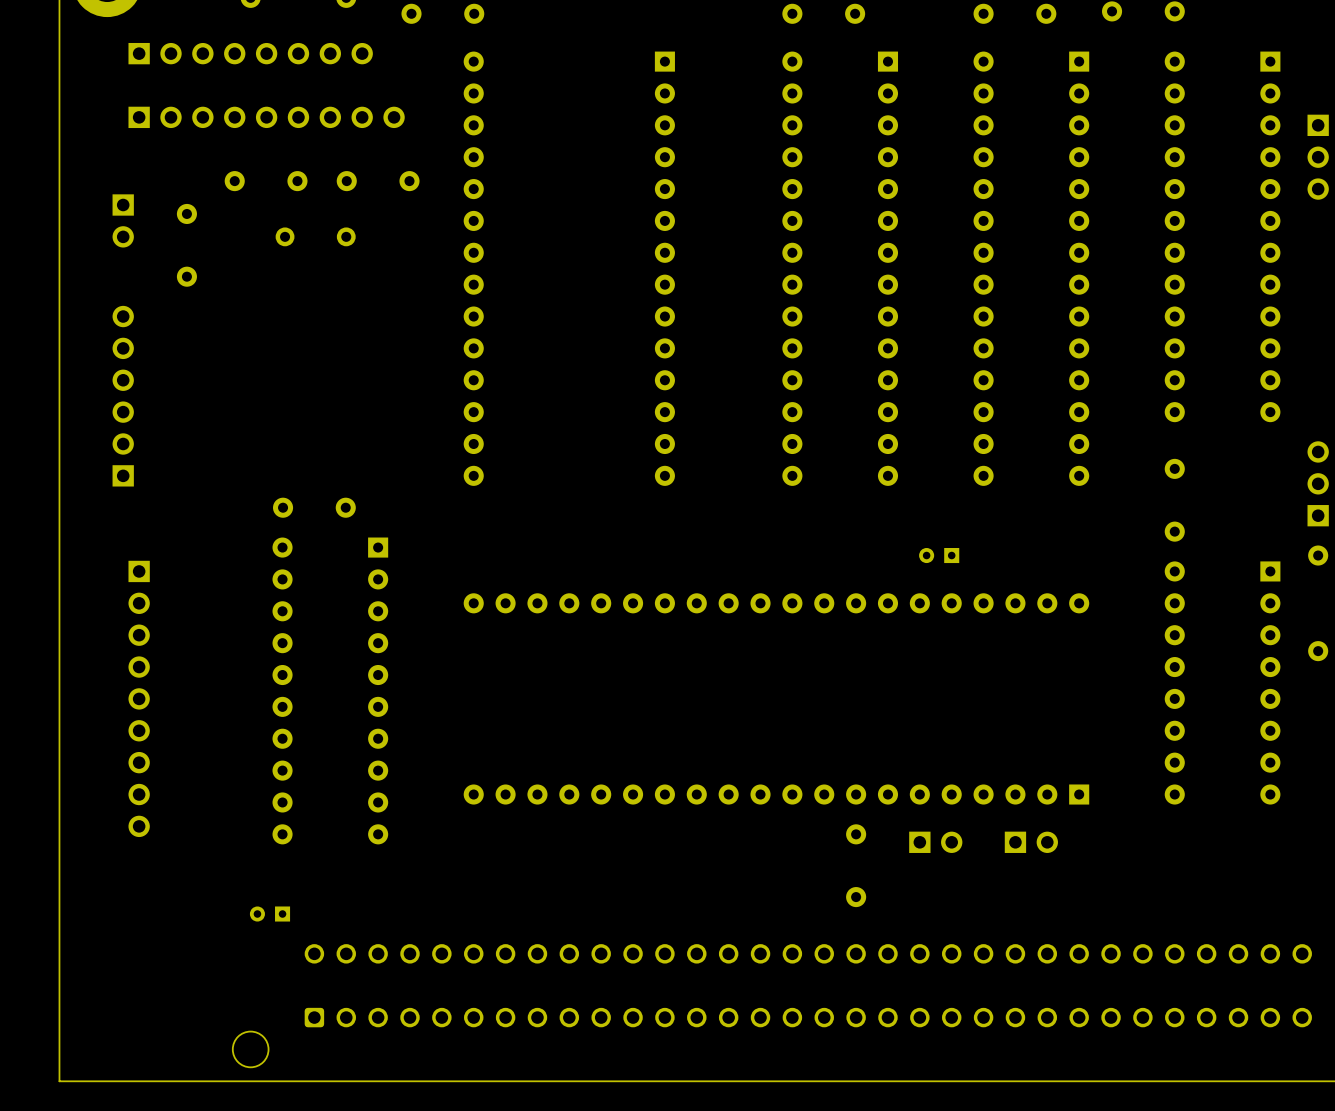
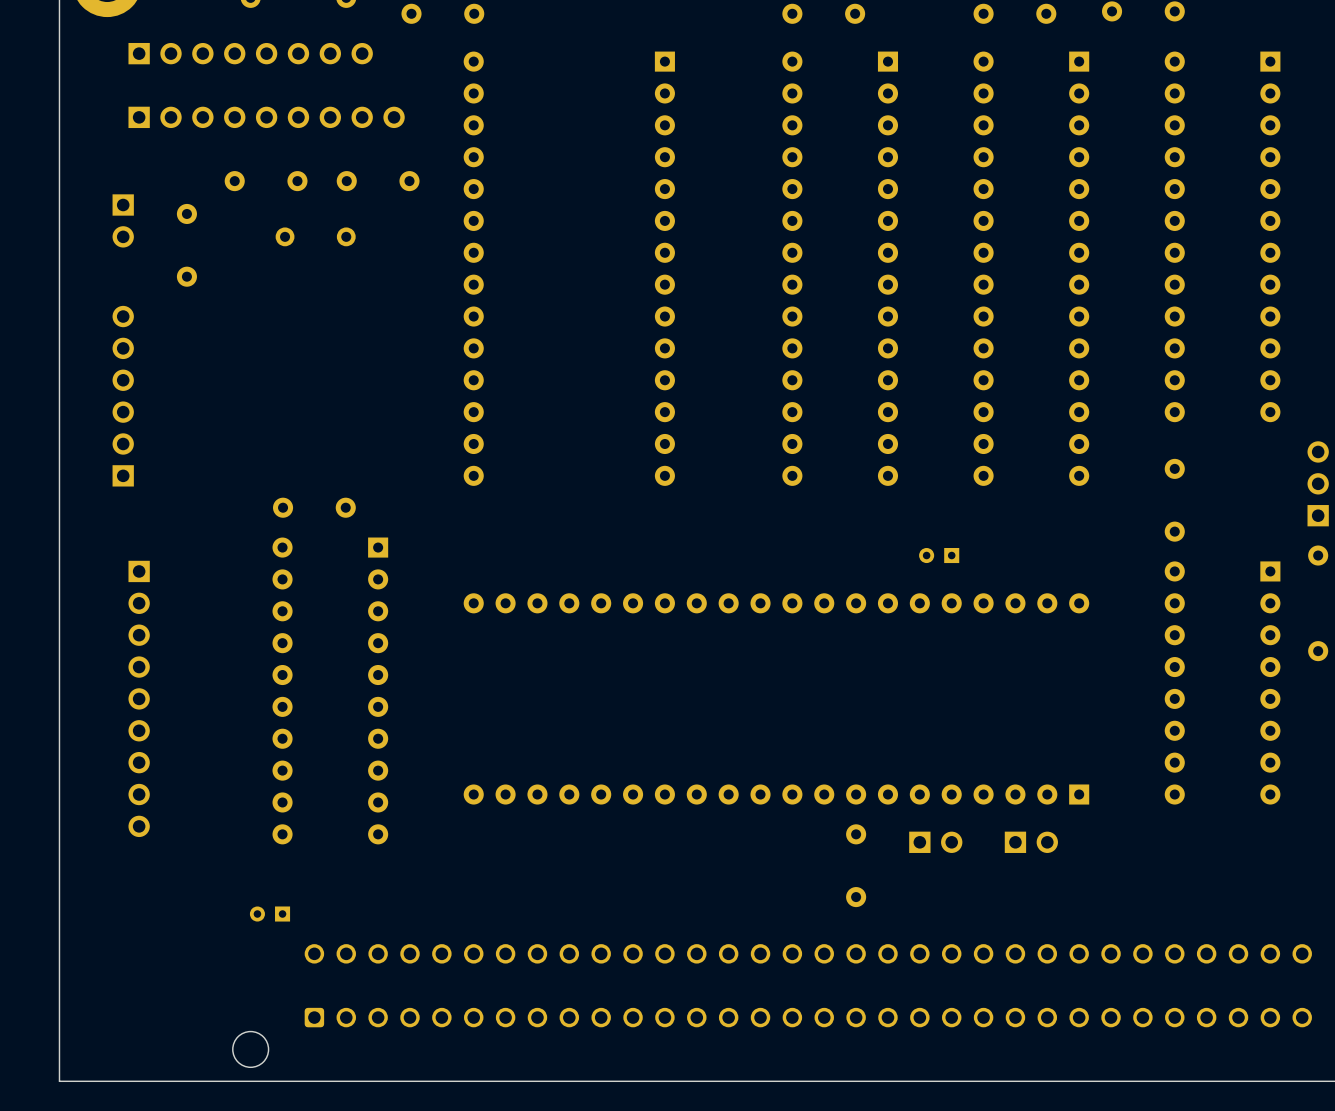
part: (1318, 157) -> none

